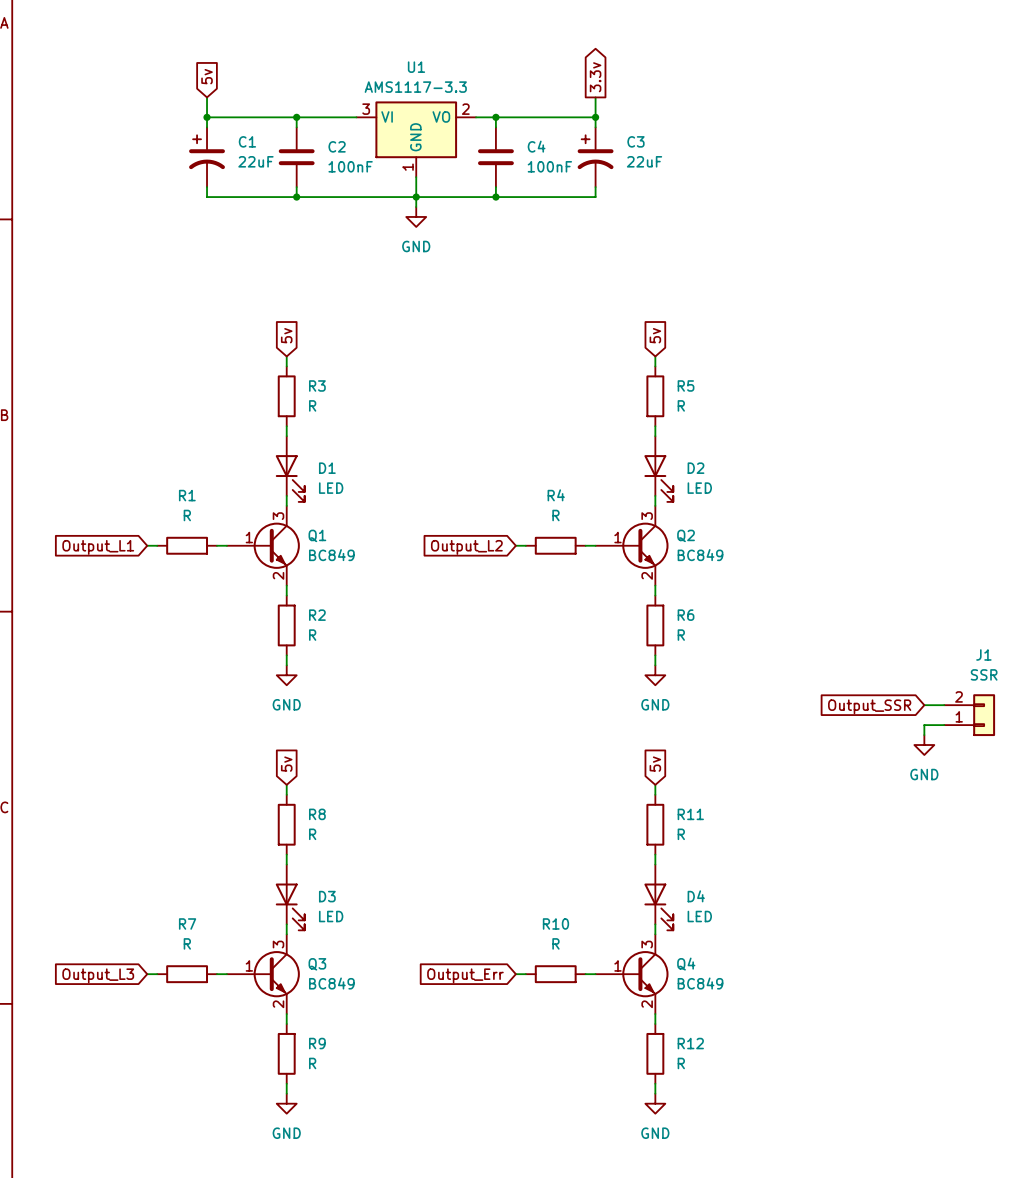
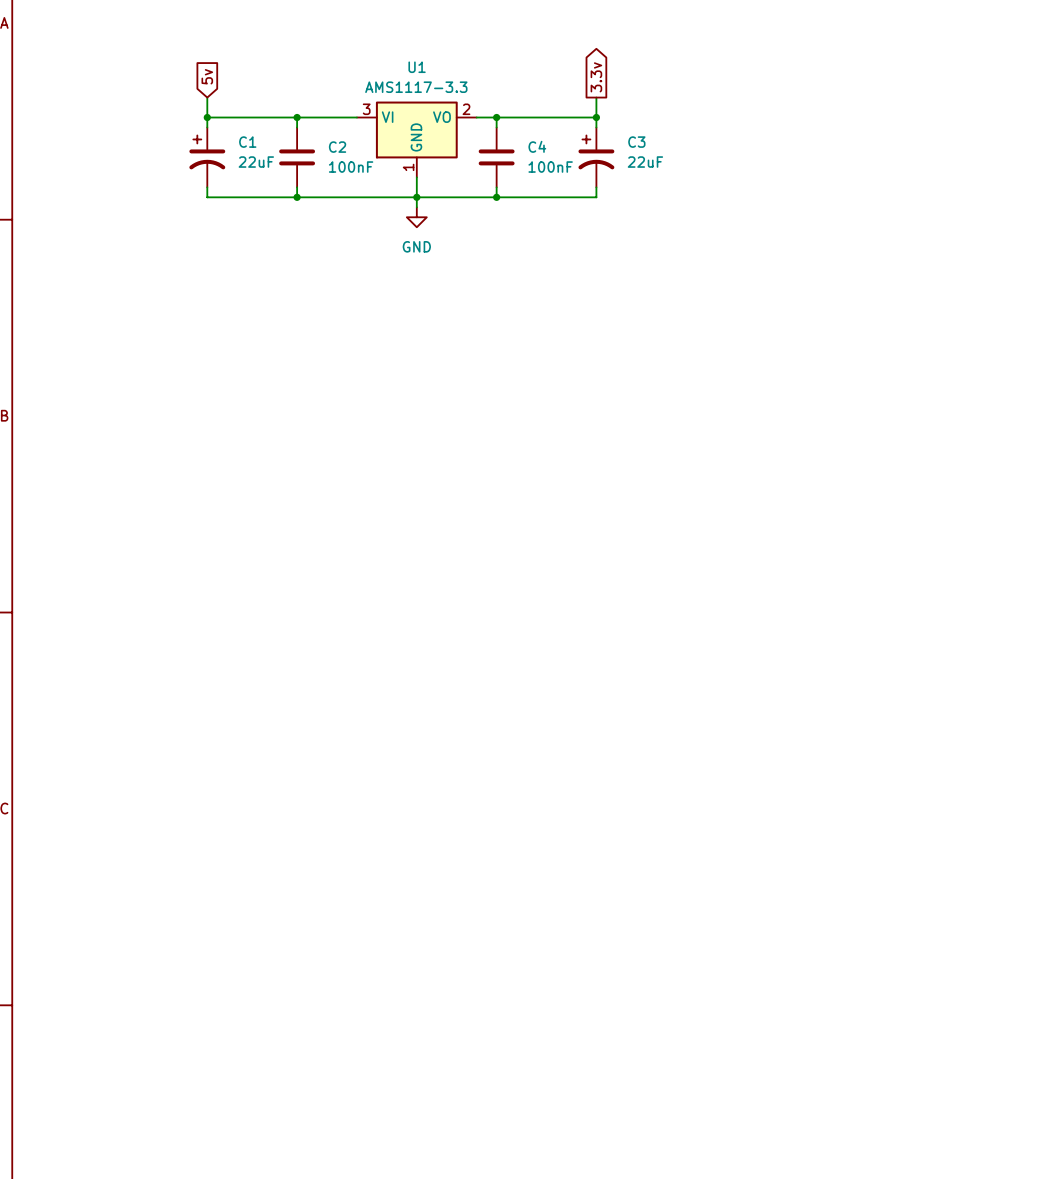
global label: 5v (286, 335) -> none
global label: 5v (655, 335) -> none
wire: (286, 356) (286, 366) -> none
wire: (655, 356) (655, 366) -> none
R3: R (286, 396) -> none
R5: R (655, 396) -> none
wire: (286, 426) (286, 436) -> none
wire: (655, 426) (655, 436) -> none
D1: LED (290, 469) -> none
D2: LED (658, 469) -> none
wire: (286, 495) (286, 505) -> none
wire: (655, 495) (655, 505) -> none
wire: (147, 545) (157, 545) -> none
R1: R (187, 545) -> none
wire: (216, 545) (226, 545) -> none
Q1: BC849 (263, 545) -> none
wire: (515, 545) (525, 545) -> none
R4: R (555, 545) -> none
wire: (585, 545) (595, 545) -> none
Q2: BC849 (632, 545) -> none
global label: Output_L1 (98, 547) -> none
global label: Output_L2 (466, 547) -> none
wire: (286, 585) (286, 595) -> none
wire: (655, 585) (655, 595) -> none
R2: R (286, 625) -> none
R6: R (655, 625) -> none
wire: (286, 655) (286, 665) -> none
wire: (655, 655) (655, 665) -> none
power symbol: GND (286, 675) -> none
power symbol: GND (655, 675) -> none
wire: (924, 705) (944, 705) -> none
global label: Output_SSR (869, 706) -> none
J1: SSR (969, 715) -> none
wire: (944, 725) (924, 725) (924, 735) -> none
power symbol: GND (924, 745) -> none
global label: 5v (286, 764) -> none
global label: 5v (655, 764) -> none
wire: (286, 784) (286, 794) -> none
wire: (655, 784) (655, 794) -> none
R8: R (286, 824) -> none
R11: R (655, 824) -> none
wire: (286, 854) (286, 864) -> none
wire: (655, 854) (655, 864) -> none
D3: LED (290, 897) -> none
D4: LED (658, 897) -> none
wire: (286, 924) (286, 934) -> none
wire: (655, 924) (655, 934) -> none
wire: (147, 974) (157, 974) -> none
R7: R (187, 974) -> none
wire: (216, 974) (226, 974) -> none
Q3: BC849 (263, 974) -> none
wire: (515, 974) (525, 974) -> none
R10: R (555, 974) -> none
wire: (585, 974) (595, 974) -> none
Q4: BC849 (632, 974) -> none
global label: Output_L3 (98, 975) -> none
global label: Output_Err (465, 975) -> none
wire: (286, 1014) (286, 1023) -> none
wire: (655, 1014) (655, 1023) -> none
R9: R (286, 1053) -> none
R12: R (655, 1053) -> none
wire: (286, 1083) (286, 1093) -> none
wire: (655, 1083) (655, 1093) -> none
power symbol: GND (286, 1103) -> none
power symbol: GND (655, 1103) -> none

